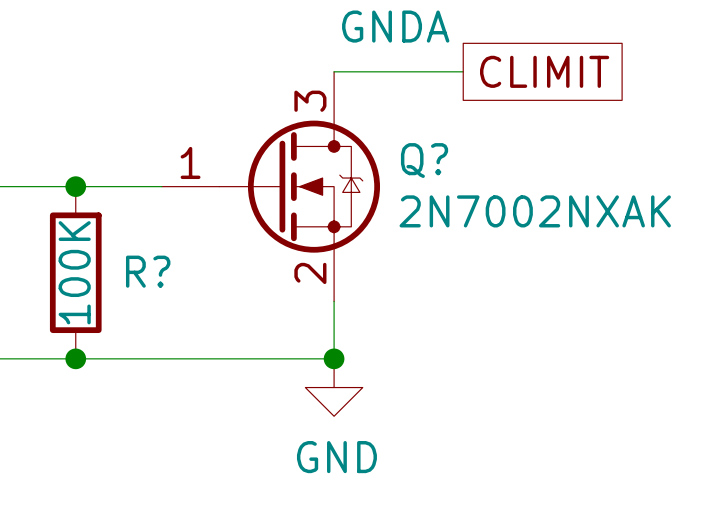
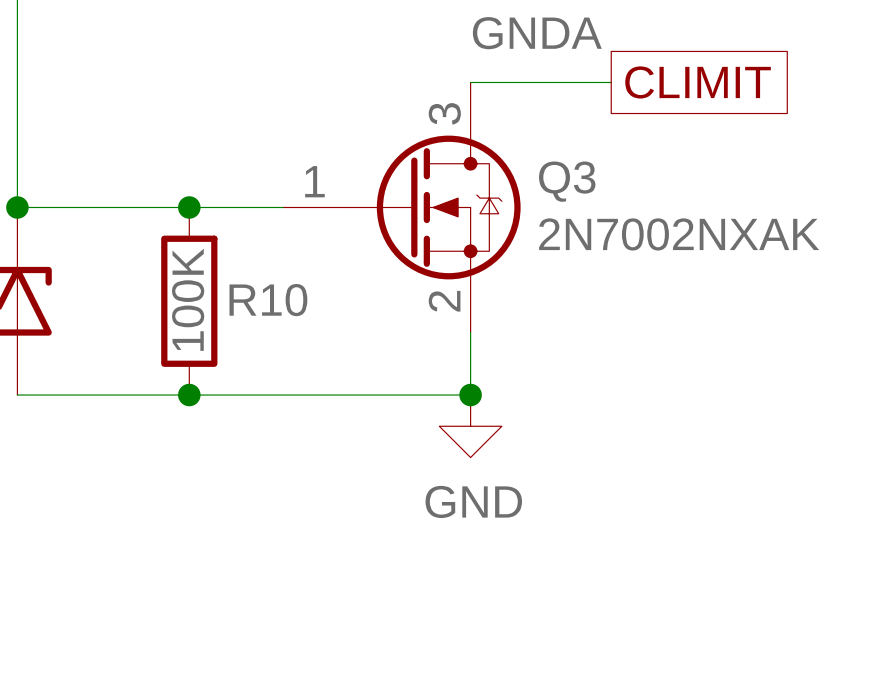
Q? name: Q? (424, 160) -> Q3 (567, 181)
R? name: R? (148, 271) -> R10 (268, 300)

